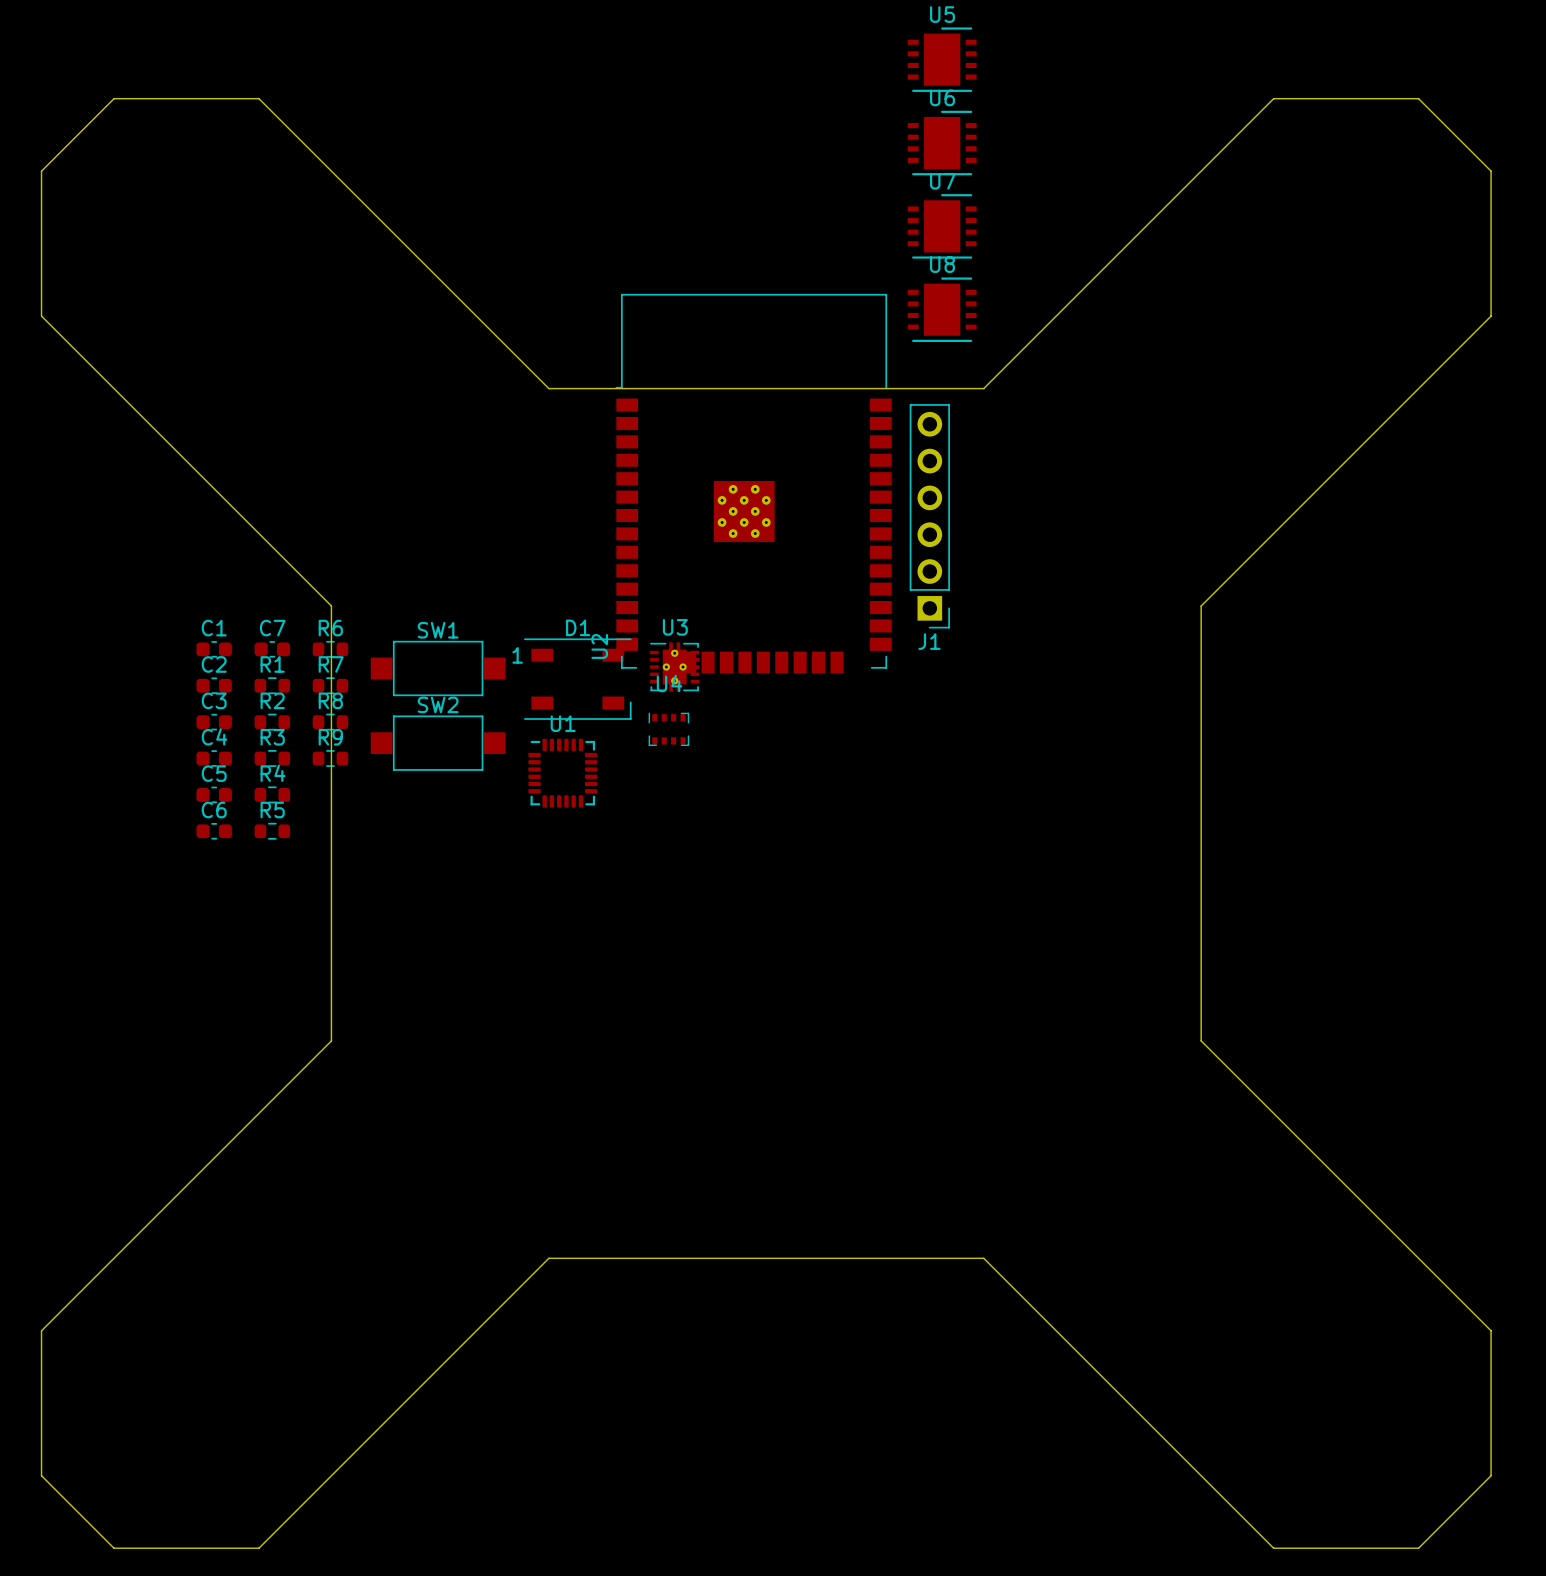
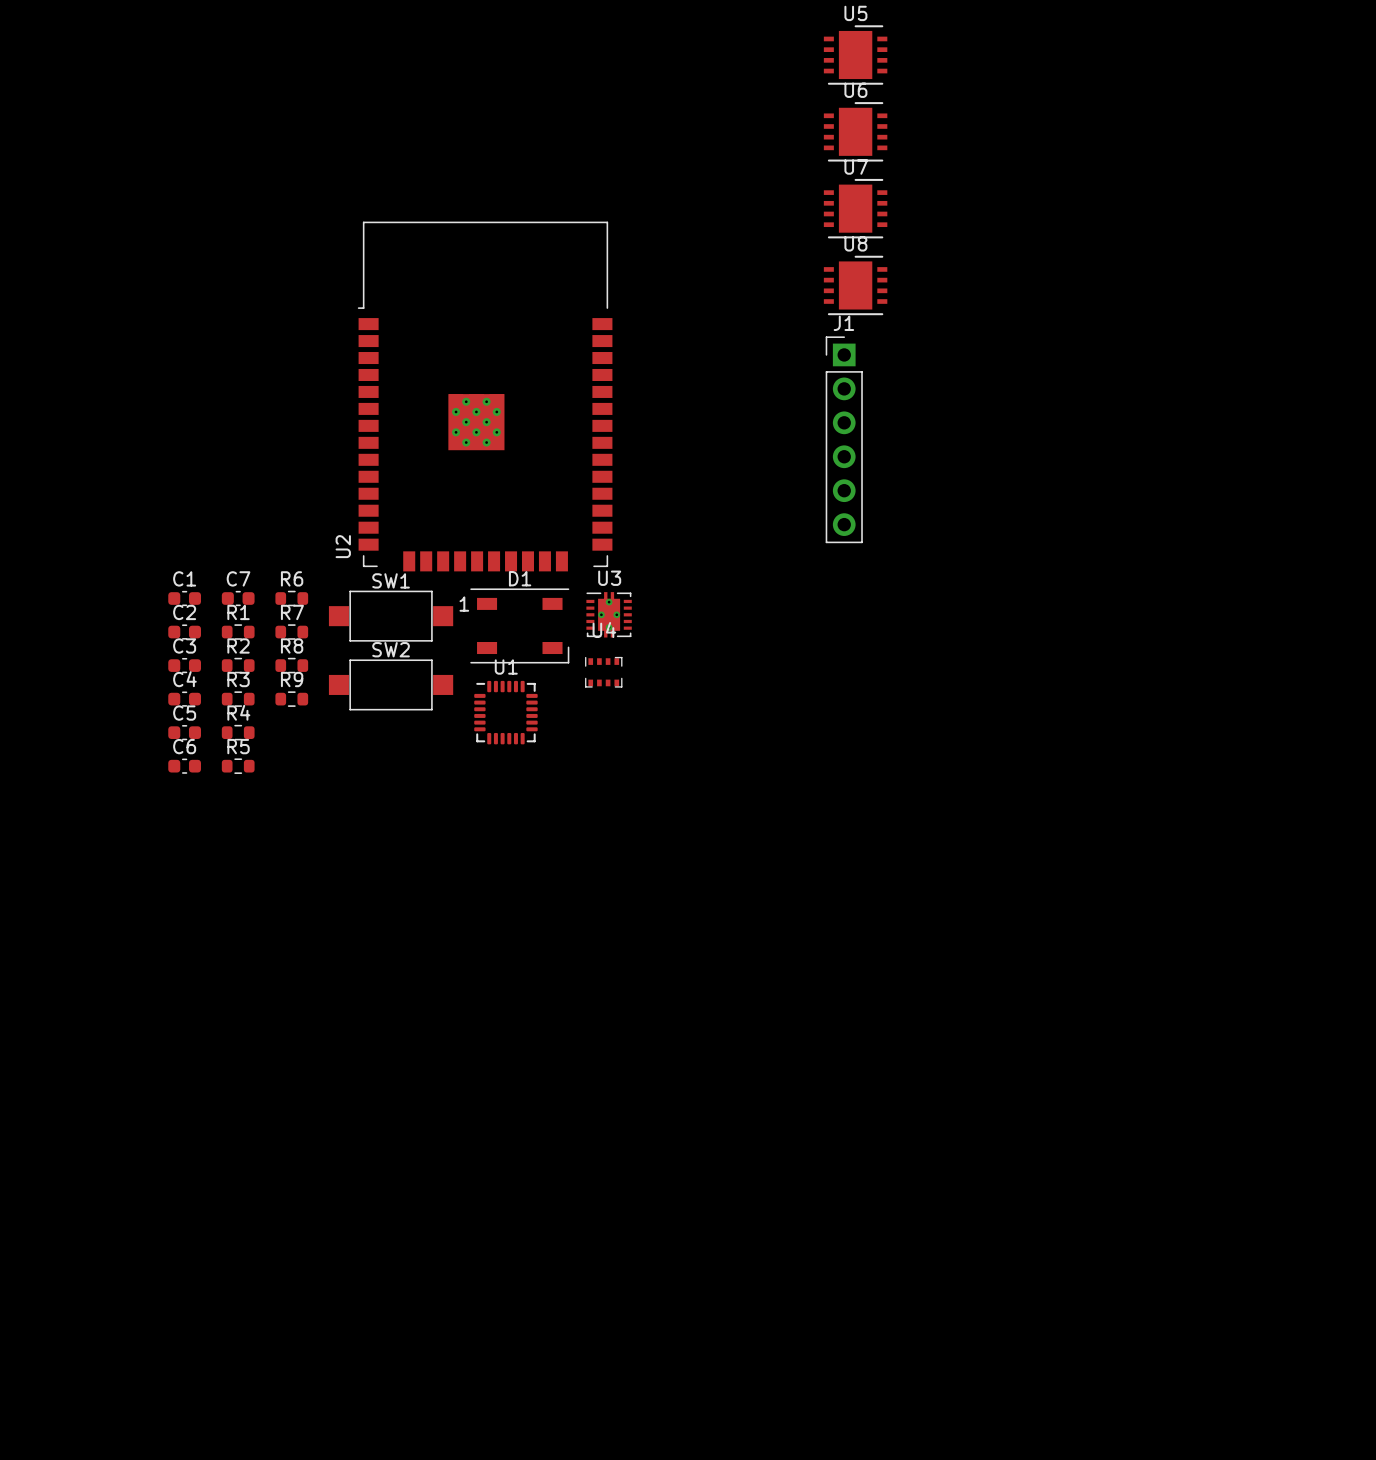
board edge: (114, 98) (258, 98) (548, 388) (983, 388) (1273, 98) (1418, 98) (1491, 171) (1491, 316) (1201, 606) (1201, 1040) (1491, 1330) (1491, 1475) (1418, 1548) (1273, 1548) (983, 1258) (548, 1258) (258, 1548) (114, 1548) (41, 1475) (41, 1330) (331, 1040) (331, 606) (41, 316) (41, 171) (114, 98) -> none
U2 position: (753, 483) -> (485, 396)
J1 rotation: 0° (929, 516) -> 180° (844, 439)

